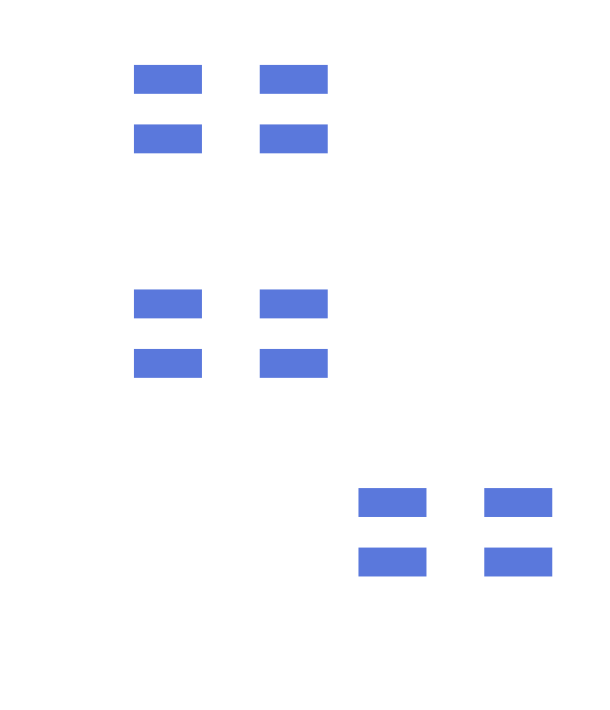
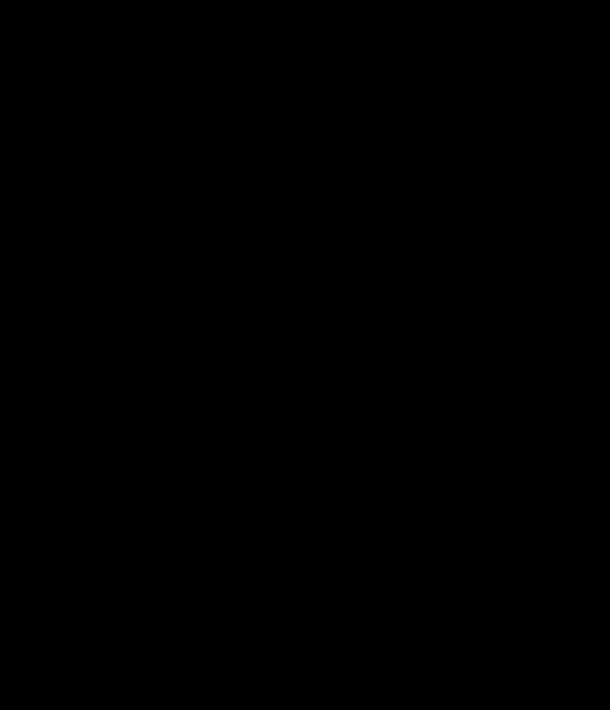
part: (230, 109) -> none
part: (230, 333) -> none
part: (455, 532) -> none

